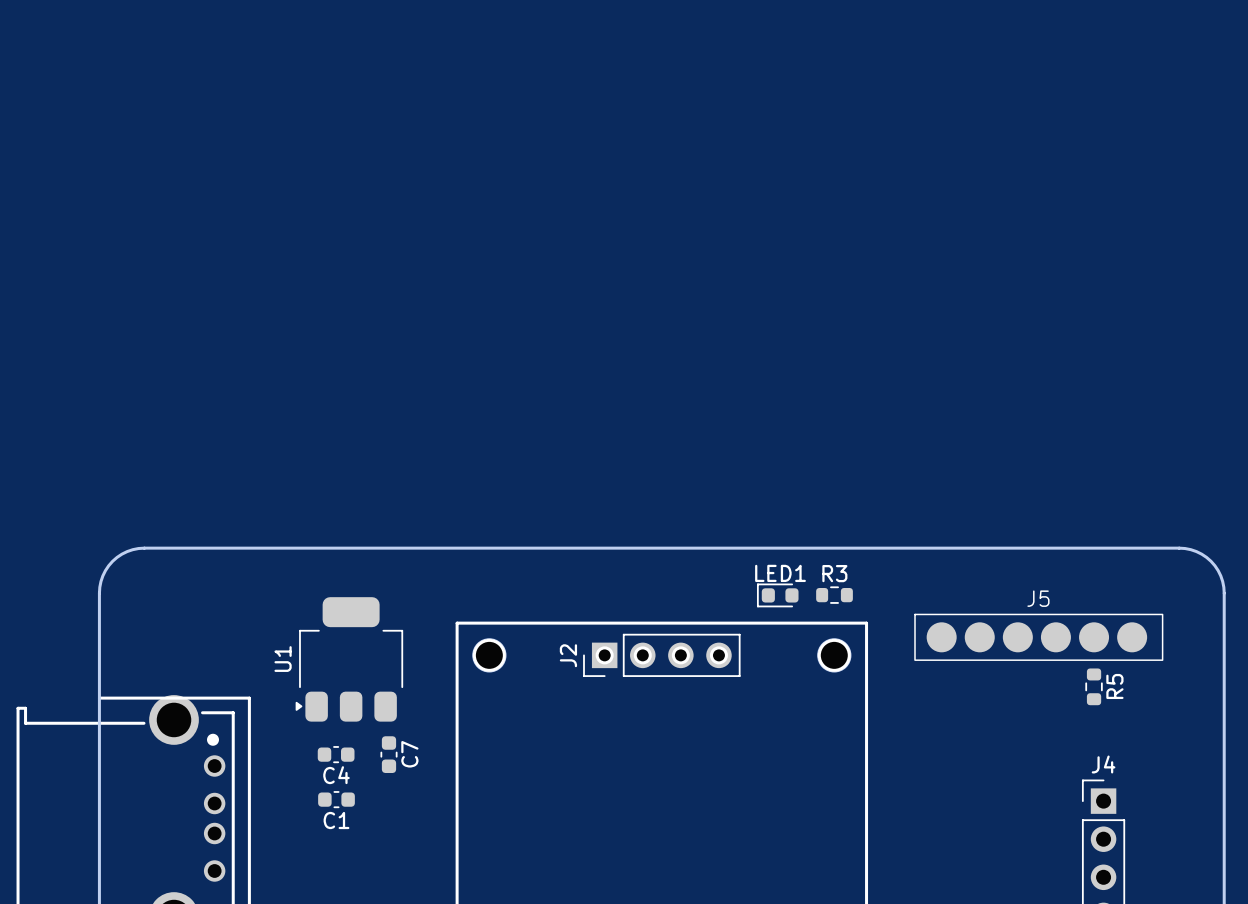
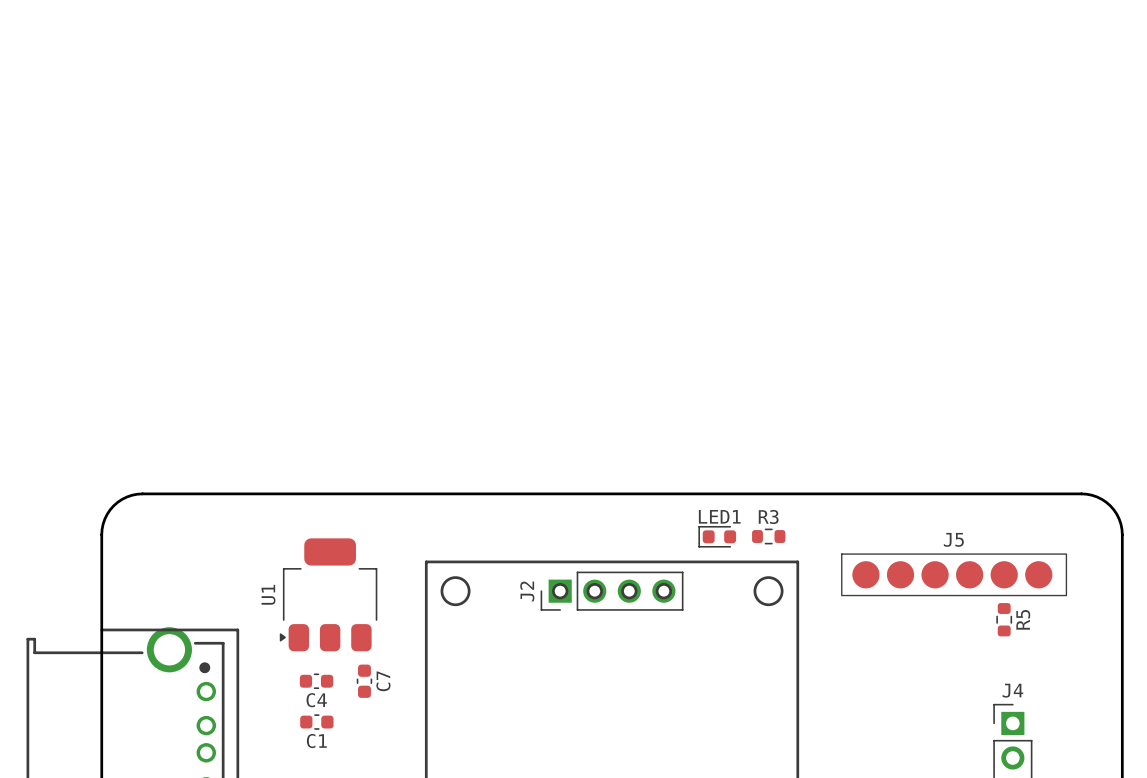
part: (489, 655) -> none
part: (834, 655) -> none

